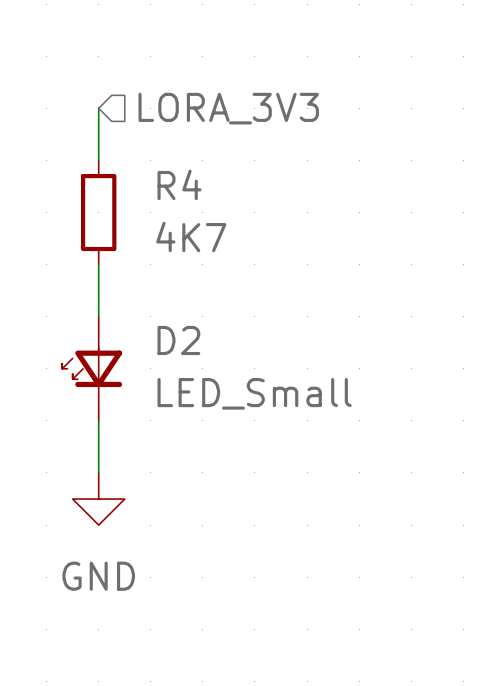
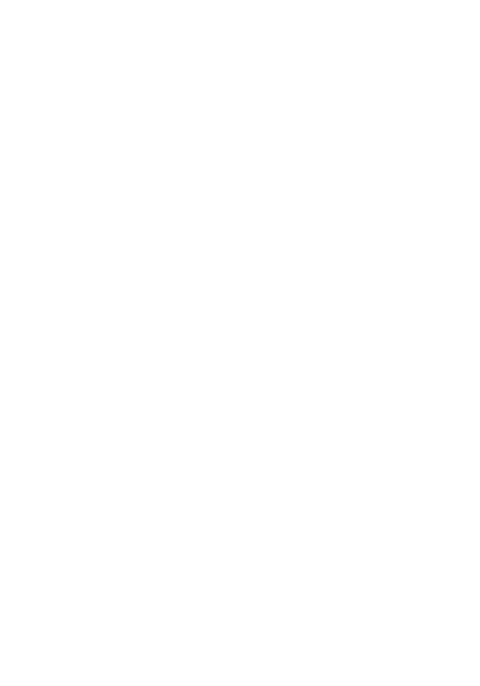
wire: (98, 108) (98, 160) -> none
hierarchical label: LORA_3V3 (228, 108) -> none
R4: 4K7 (98, 212) -> none
wire: (98, 264) (98, 316) -> none
D2: LED_Small (92, 368) -> none
wire: (98, 420) (98, 472) -> none
power symbol: GND (98, 499) -> none

